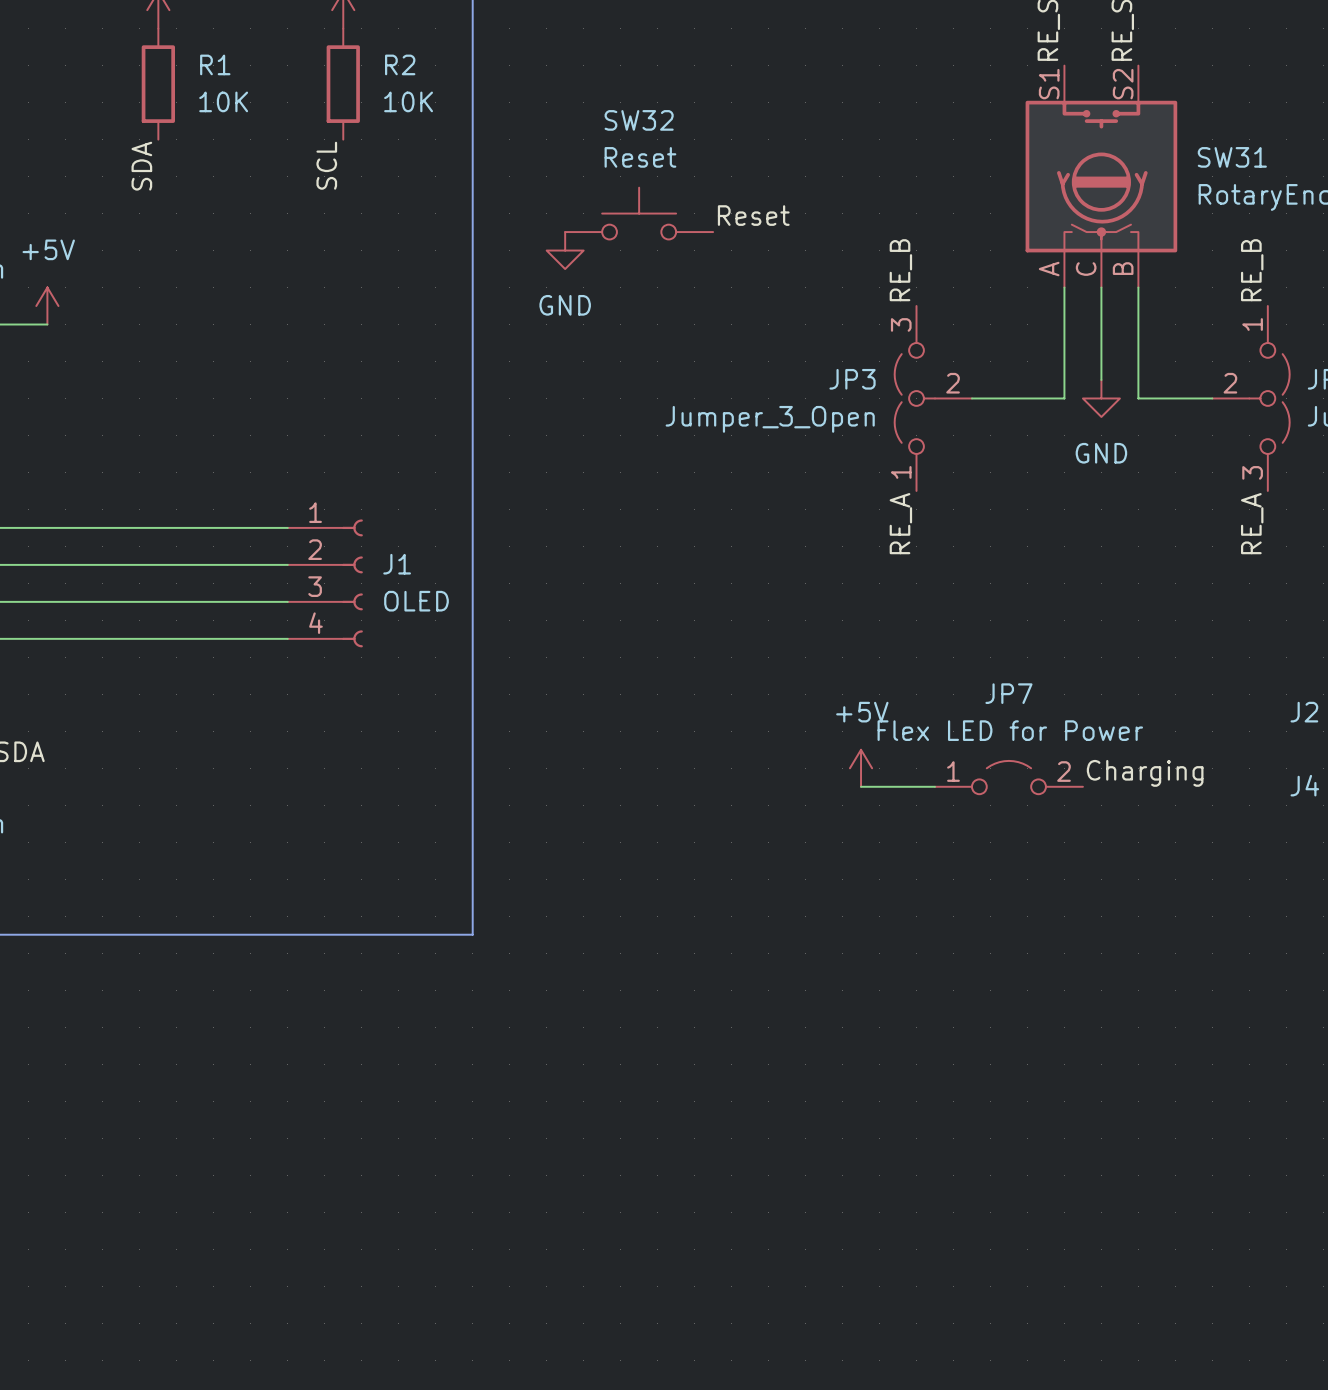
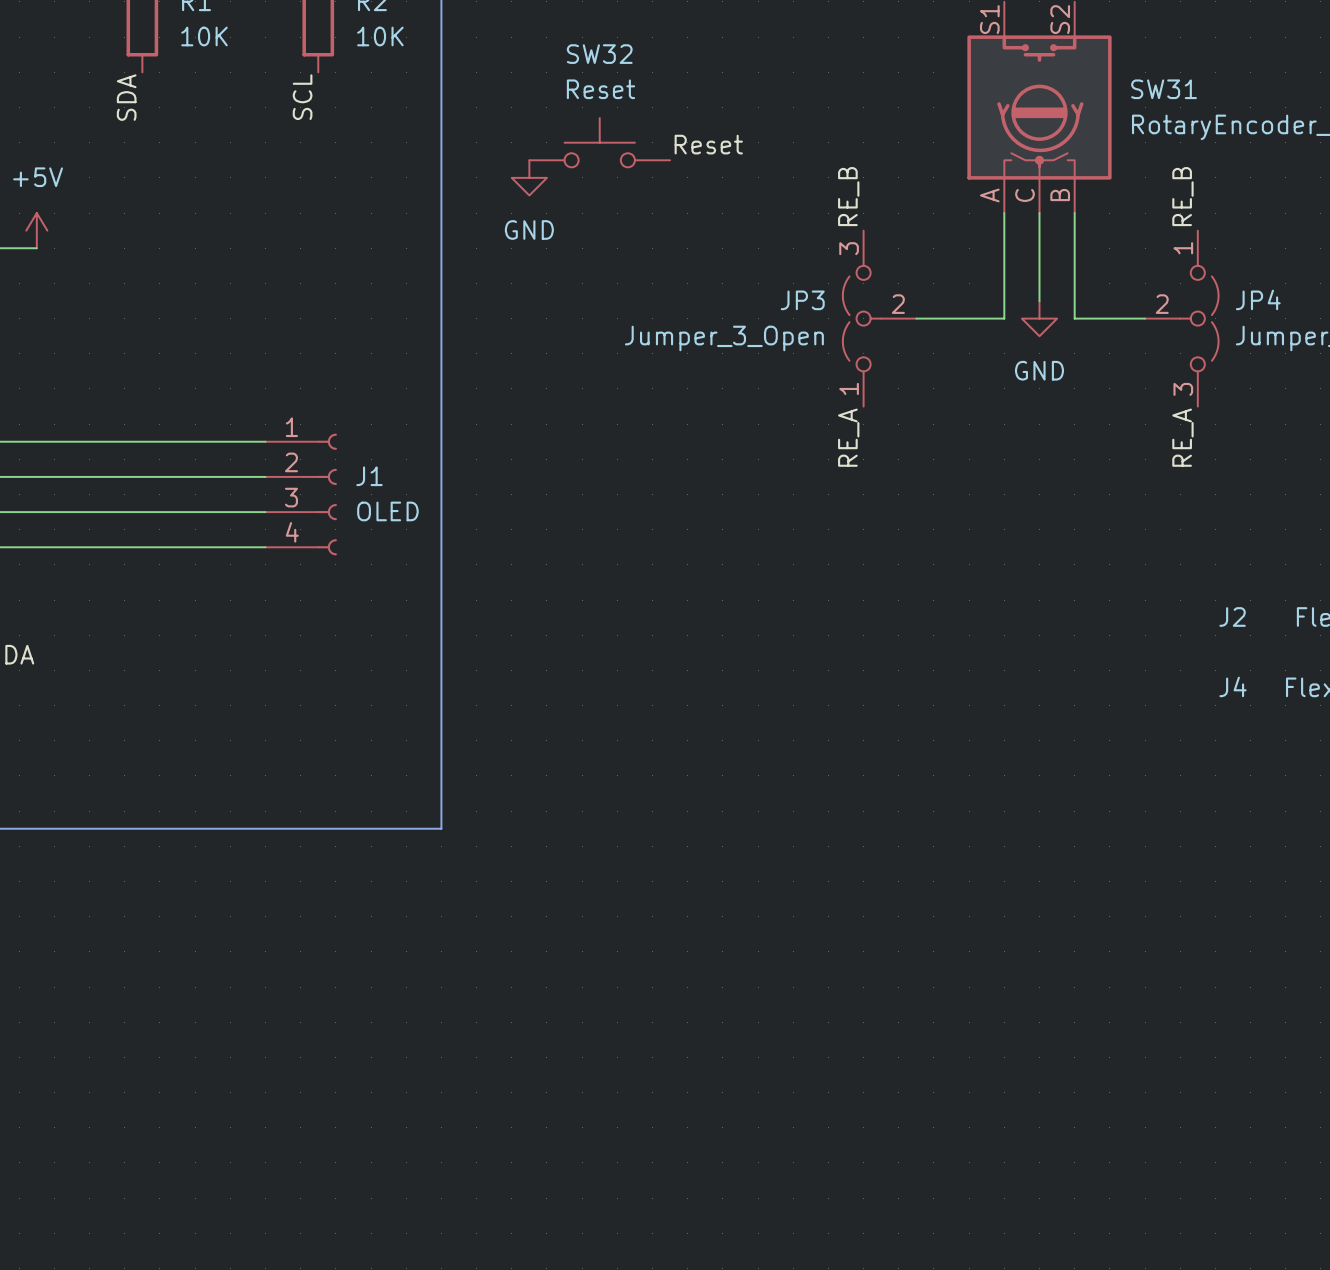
power symbol: +5V (861, 768) -> none
label: Charging (1145, 773) -> none
JP7: Flex LED for Power (1008, 777) -> none
wire: (861, 786) (934, 786) -> none

